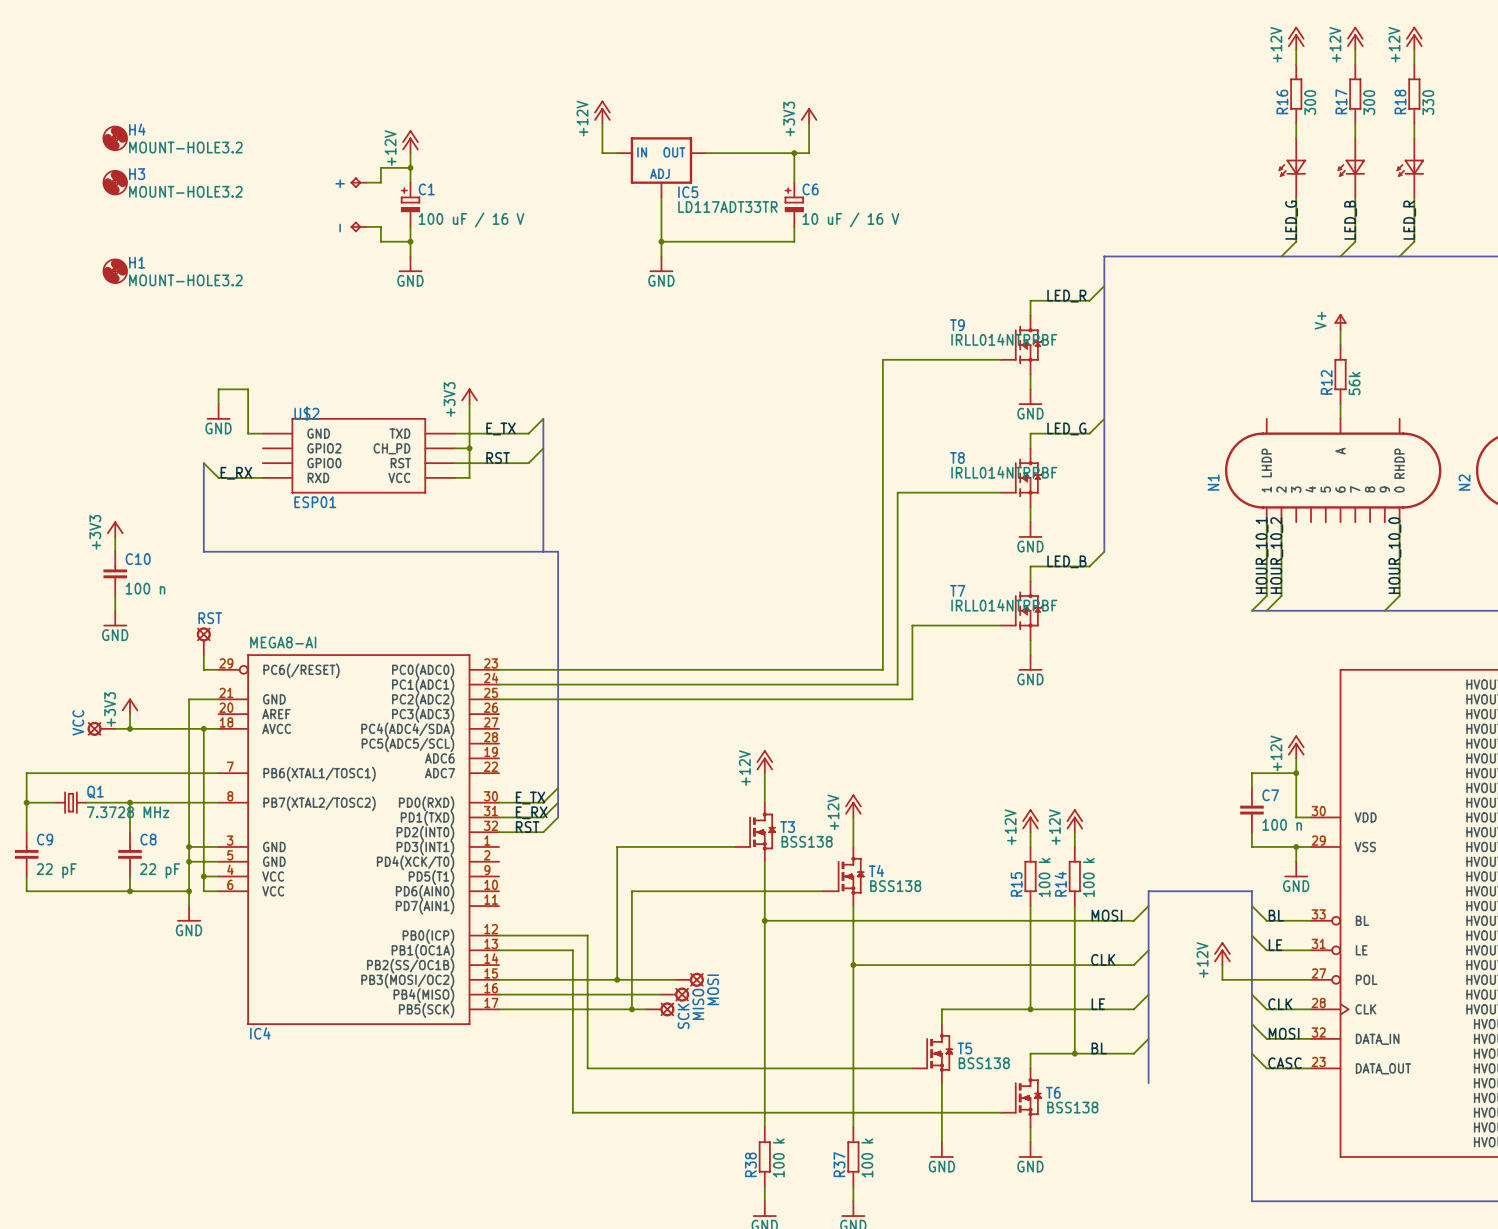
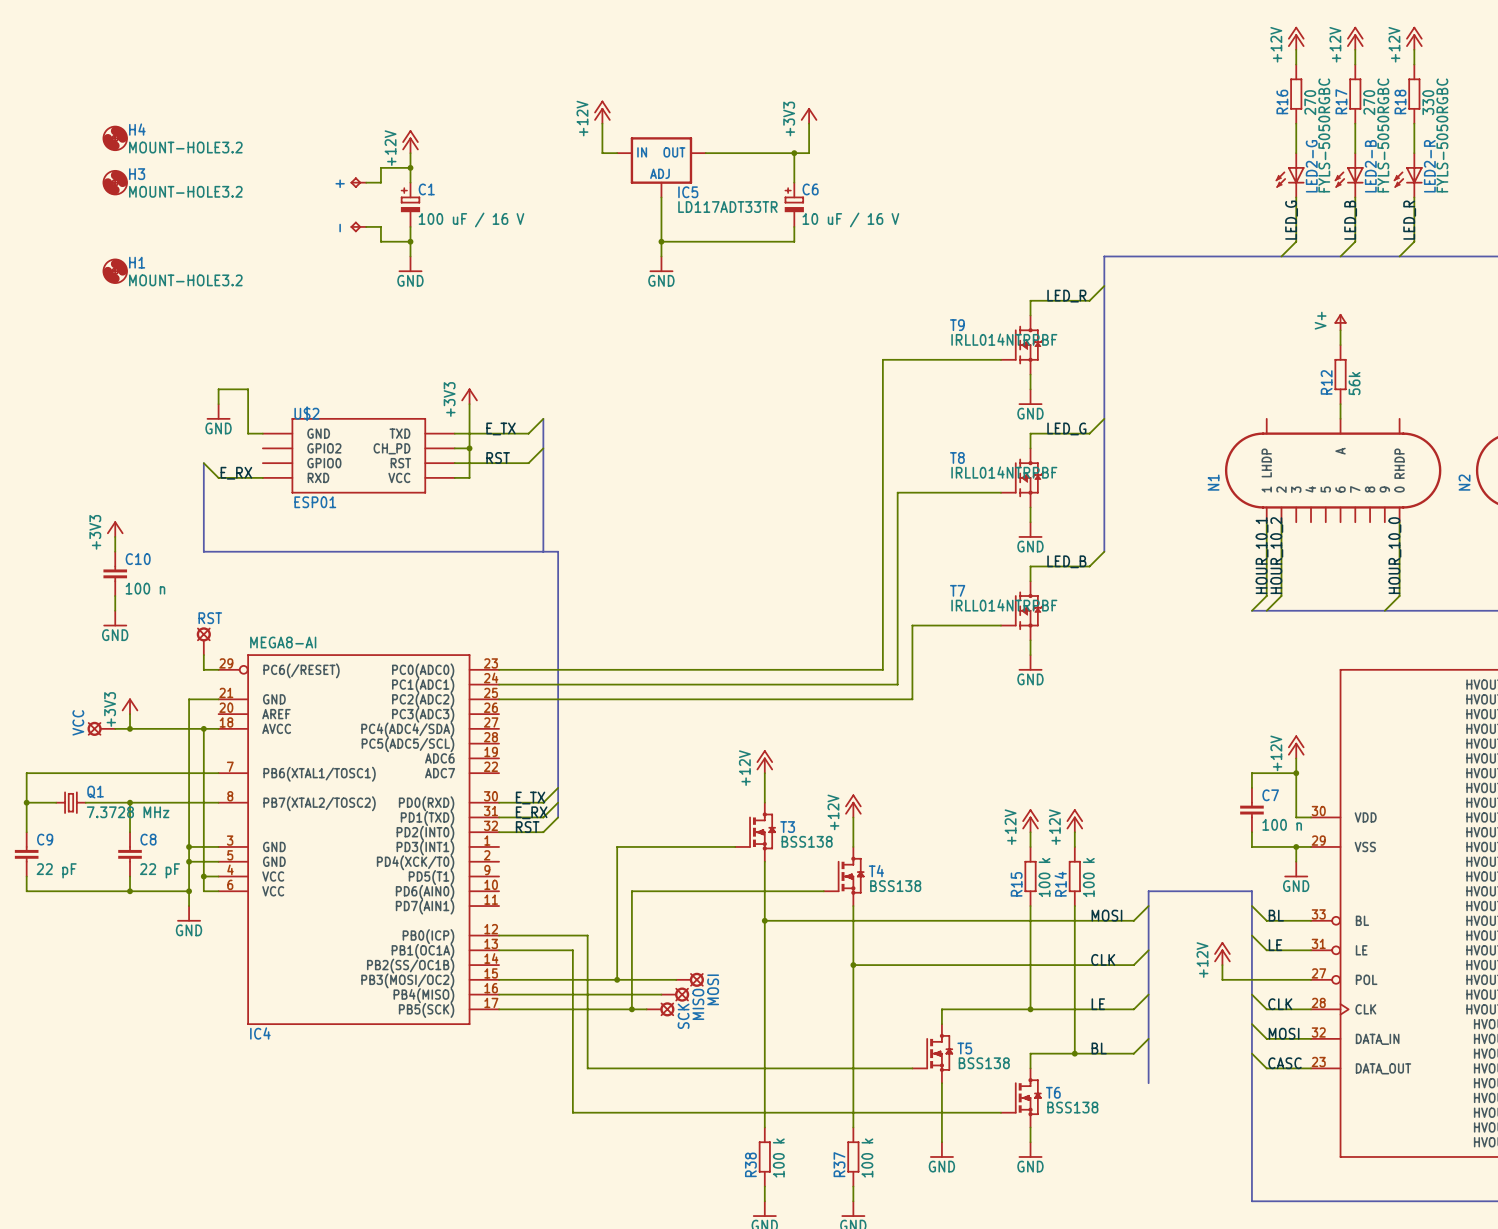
R16 value: 300 (1310, 102) -> 270 (1310, 102)
R17 value: 300 (1369, 102) -> 270 (1369, 102)
part: (1292, 167) -> none
part: (1351, 167) -> none
part: (1410, 167) -> none
LED2-G: none -> FYLS-5050RGBC (1290, 175)
LED2-B: none -> FYLS-5050RGBC (1349, 175)
LED2-R: none -> FYLS-5050RGBC (1408, 175)

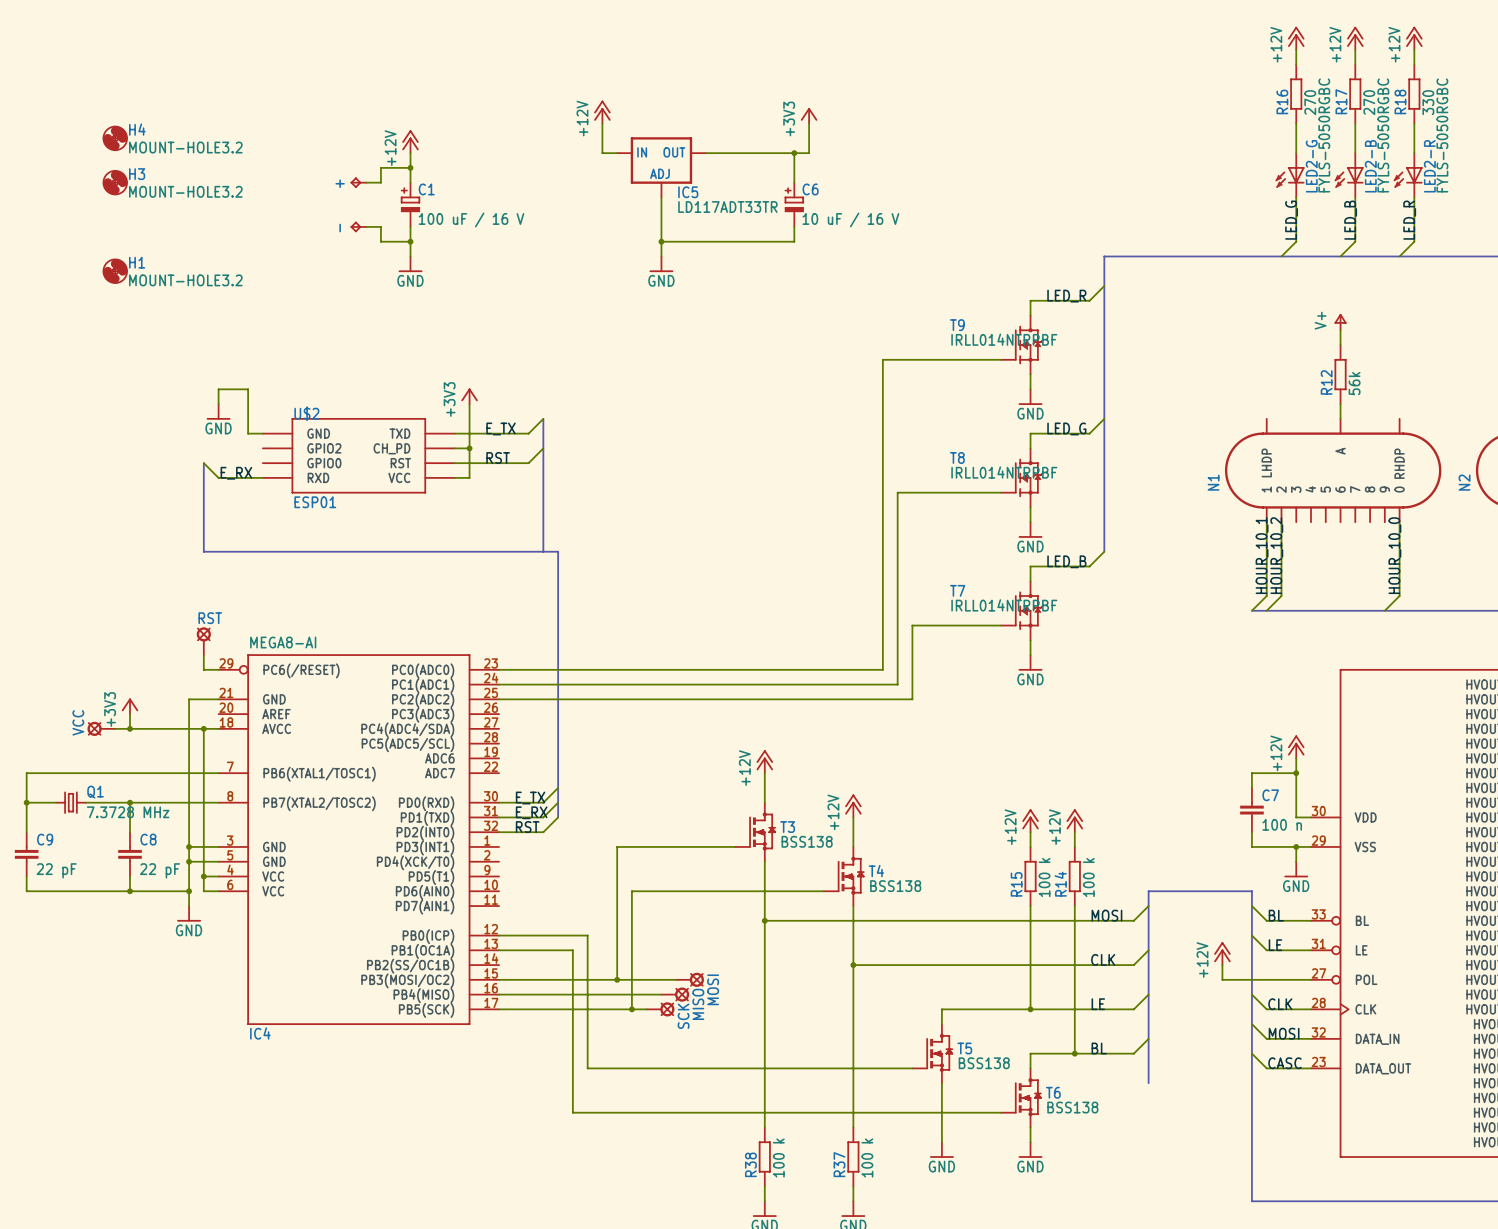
power symbol: +3V3 (115, 529) -> none
wire: (115, 536) (115, 551) -> none
C10: 100 n (115, 573) -> none
wire: (115, 596) (115, 610) -> none
power symbol: GND (115, 618) -> none

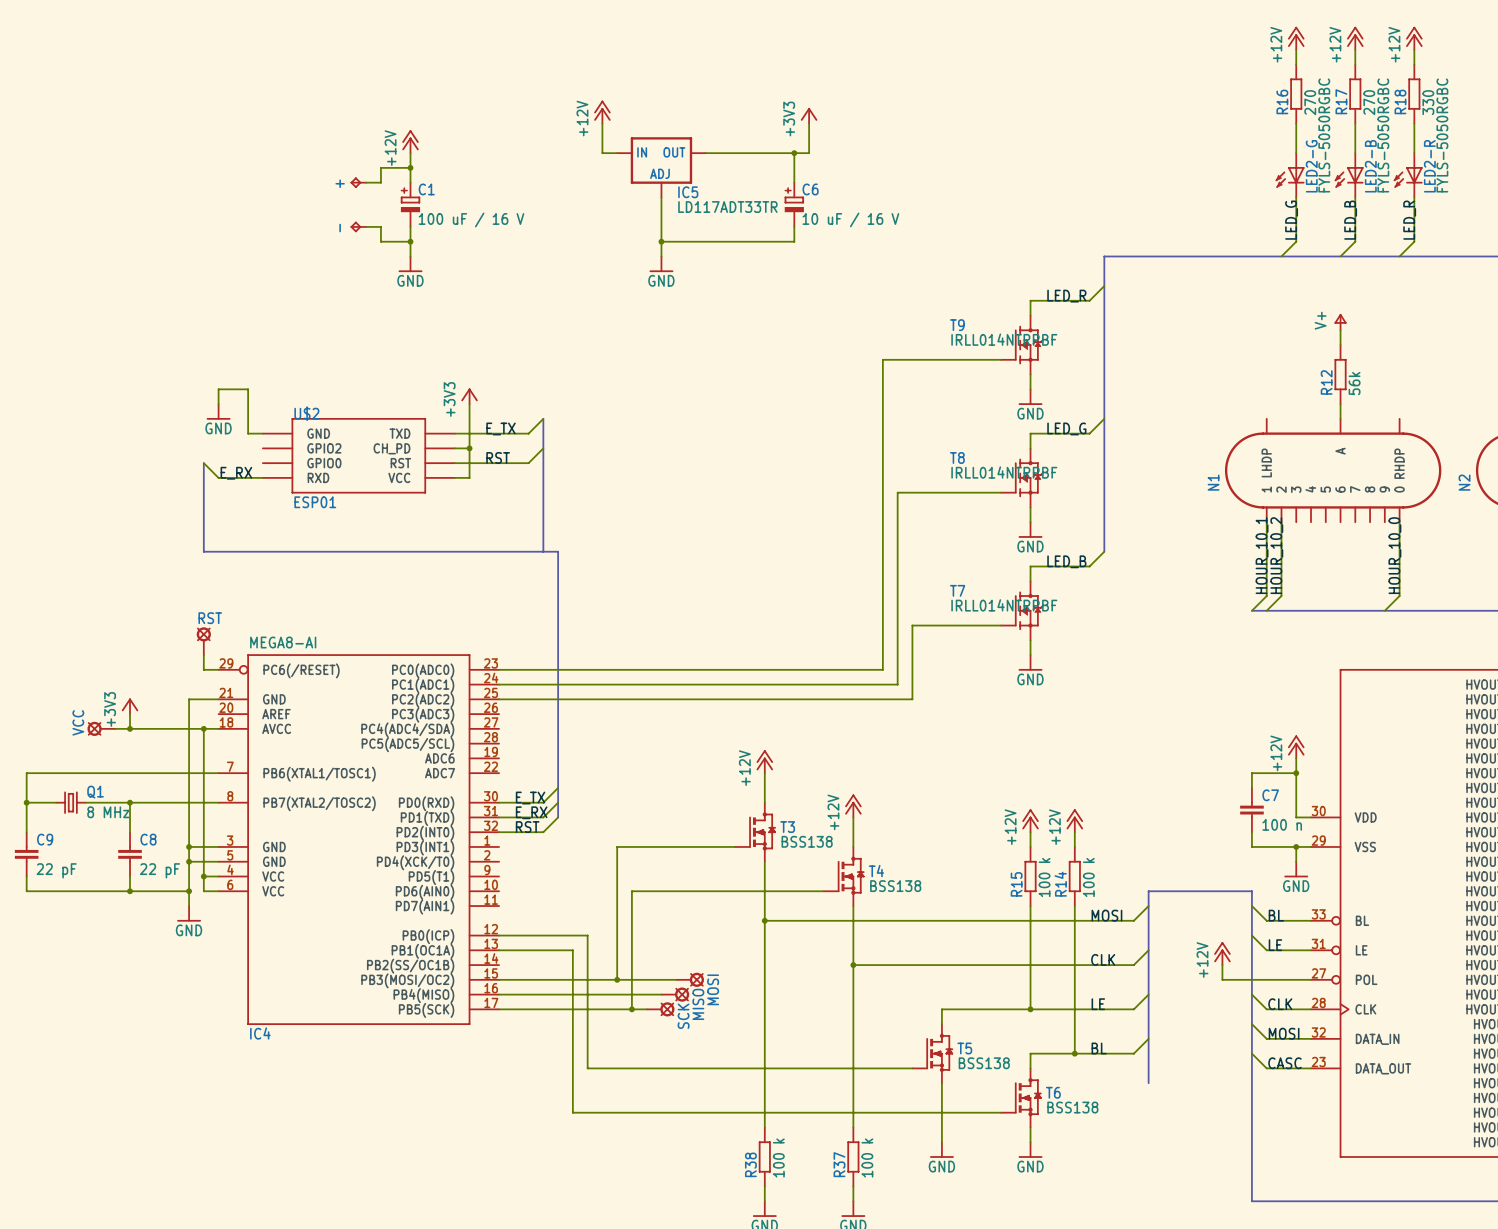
H4: MOUNT-HOLE3.2 (115, 138) -> none
H3: MOUNT-HOLE3.2 (115, 182) -> none
H1: MOUNT-HOLE3.2 (115, 271) -> none
Q1 value: 7.3728 MHz (128, 812) -> 8 MHz (108, 812)

